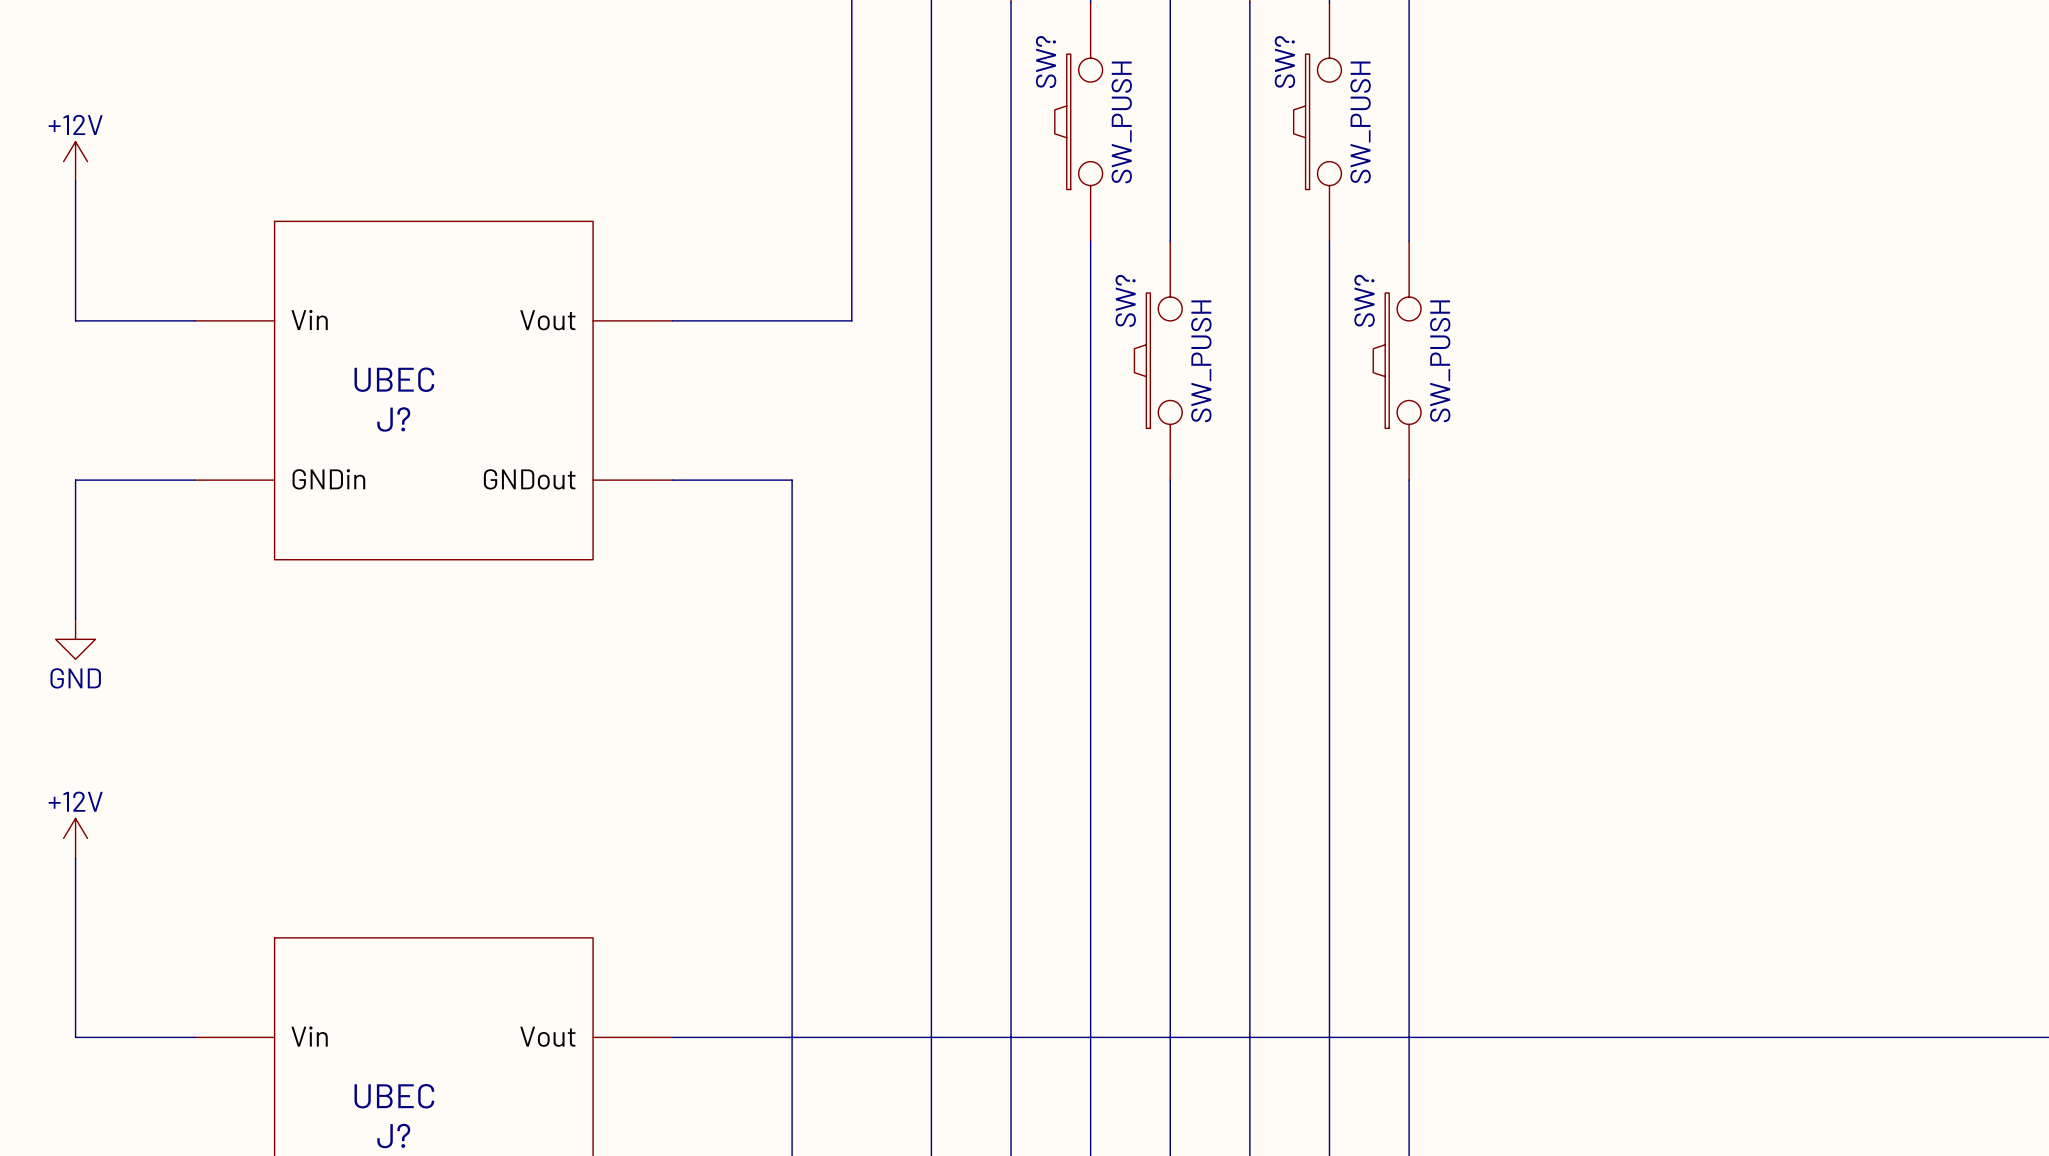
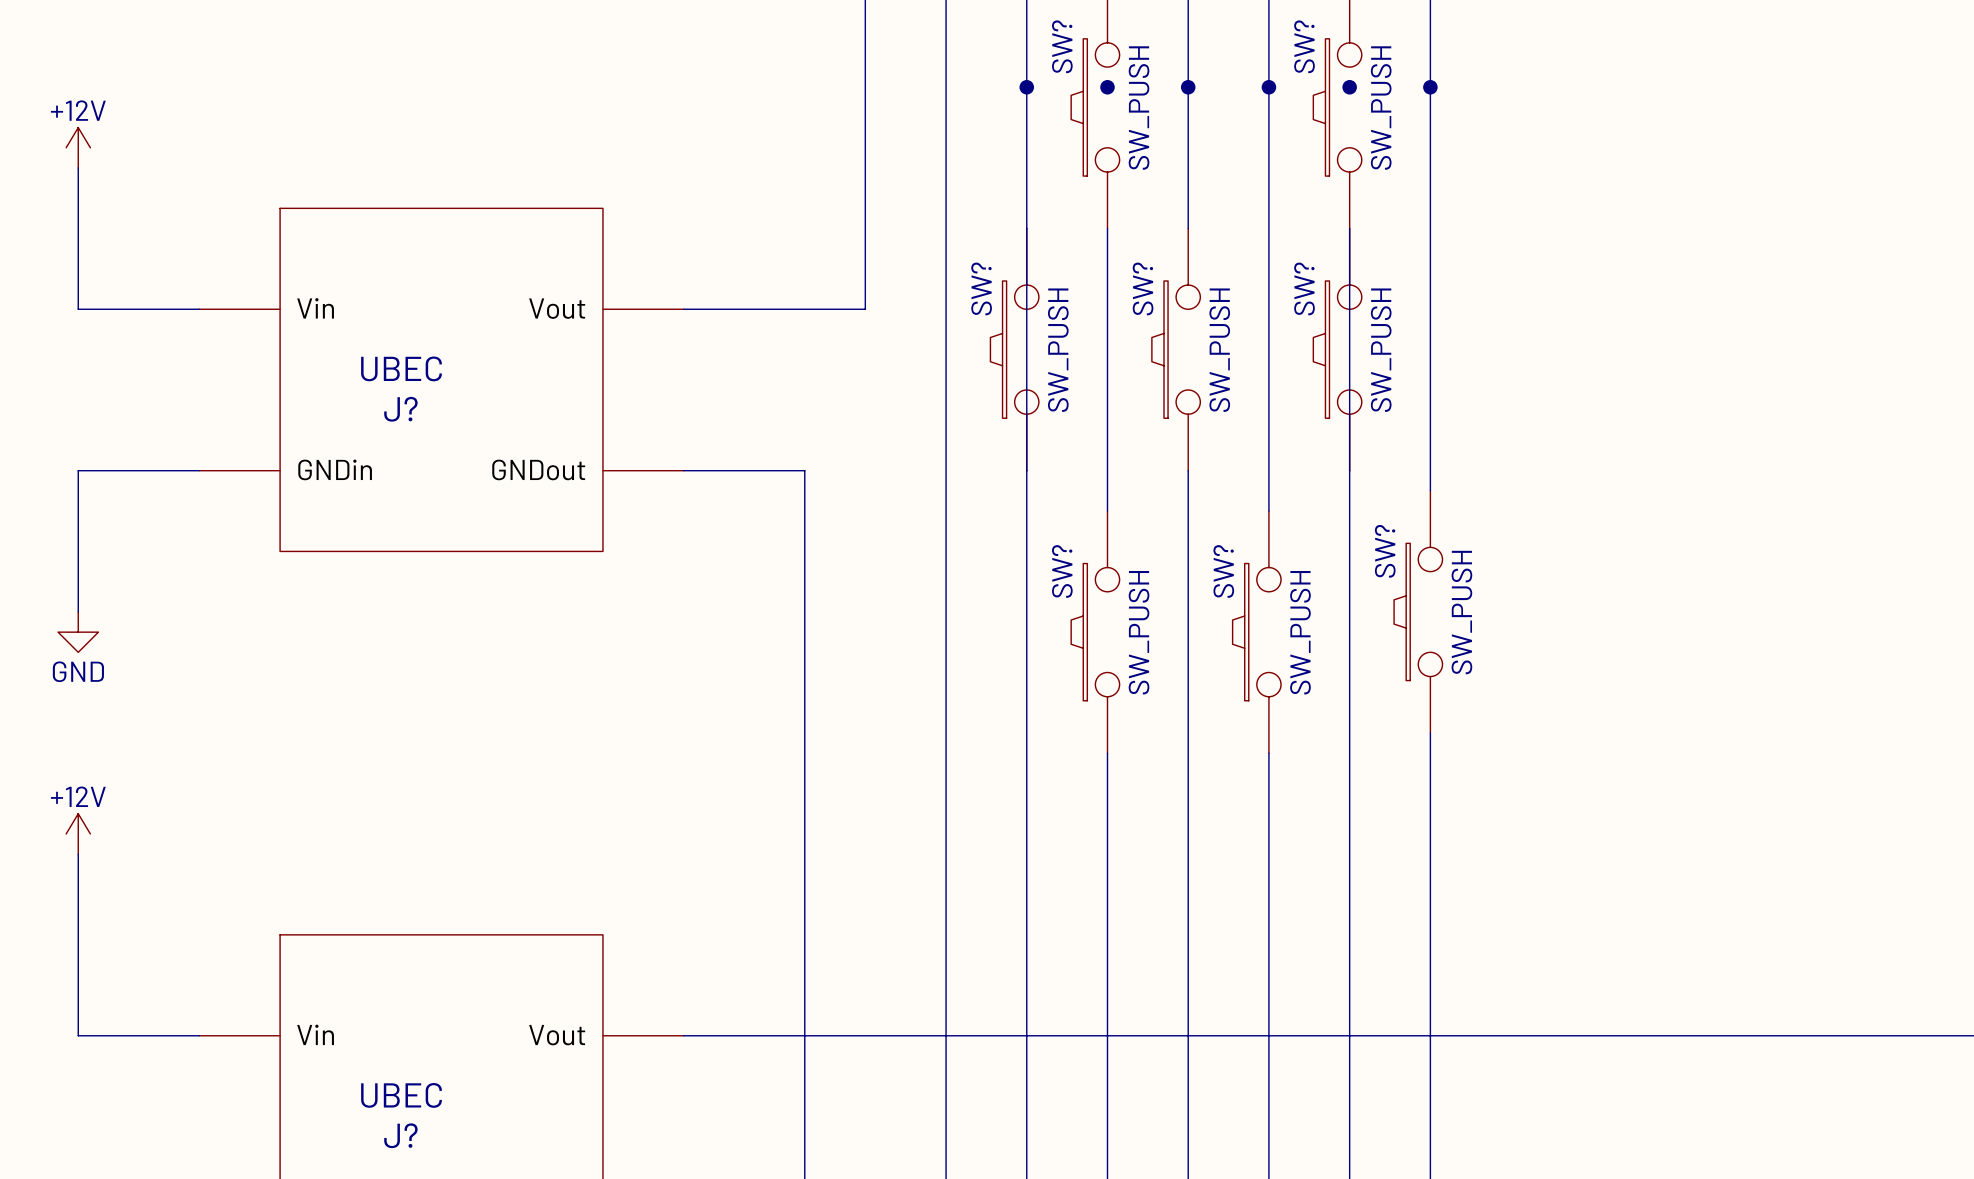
junction: none -> (1026, 87)
junction: none -> (1107, 87)
junction: none -> (1188, 87)
junction: none -> (1268, 87)
junction: none -> (1349, 87)
junction: none -> (1430, 87)
SW?: none -> SW_PUSH (1014, 349)
SW? position: (1397, 360) -> (1337, 349)
wire: (1409, 500) (1409, 738) -> (1430, 228) (1430, 470)
wire: (1090, 519) (1090, 758) -> none
wire: (1249, 519) (1249, 758) -> none
SW?: none -> SW_PUSH (1418, 611)
SW?: none -> SW_PUSH (1095, 632)
SW?: none -> SW_PUSH (1256, 632)

